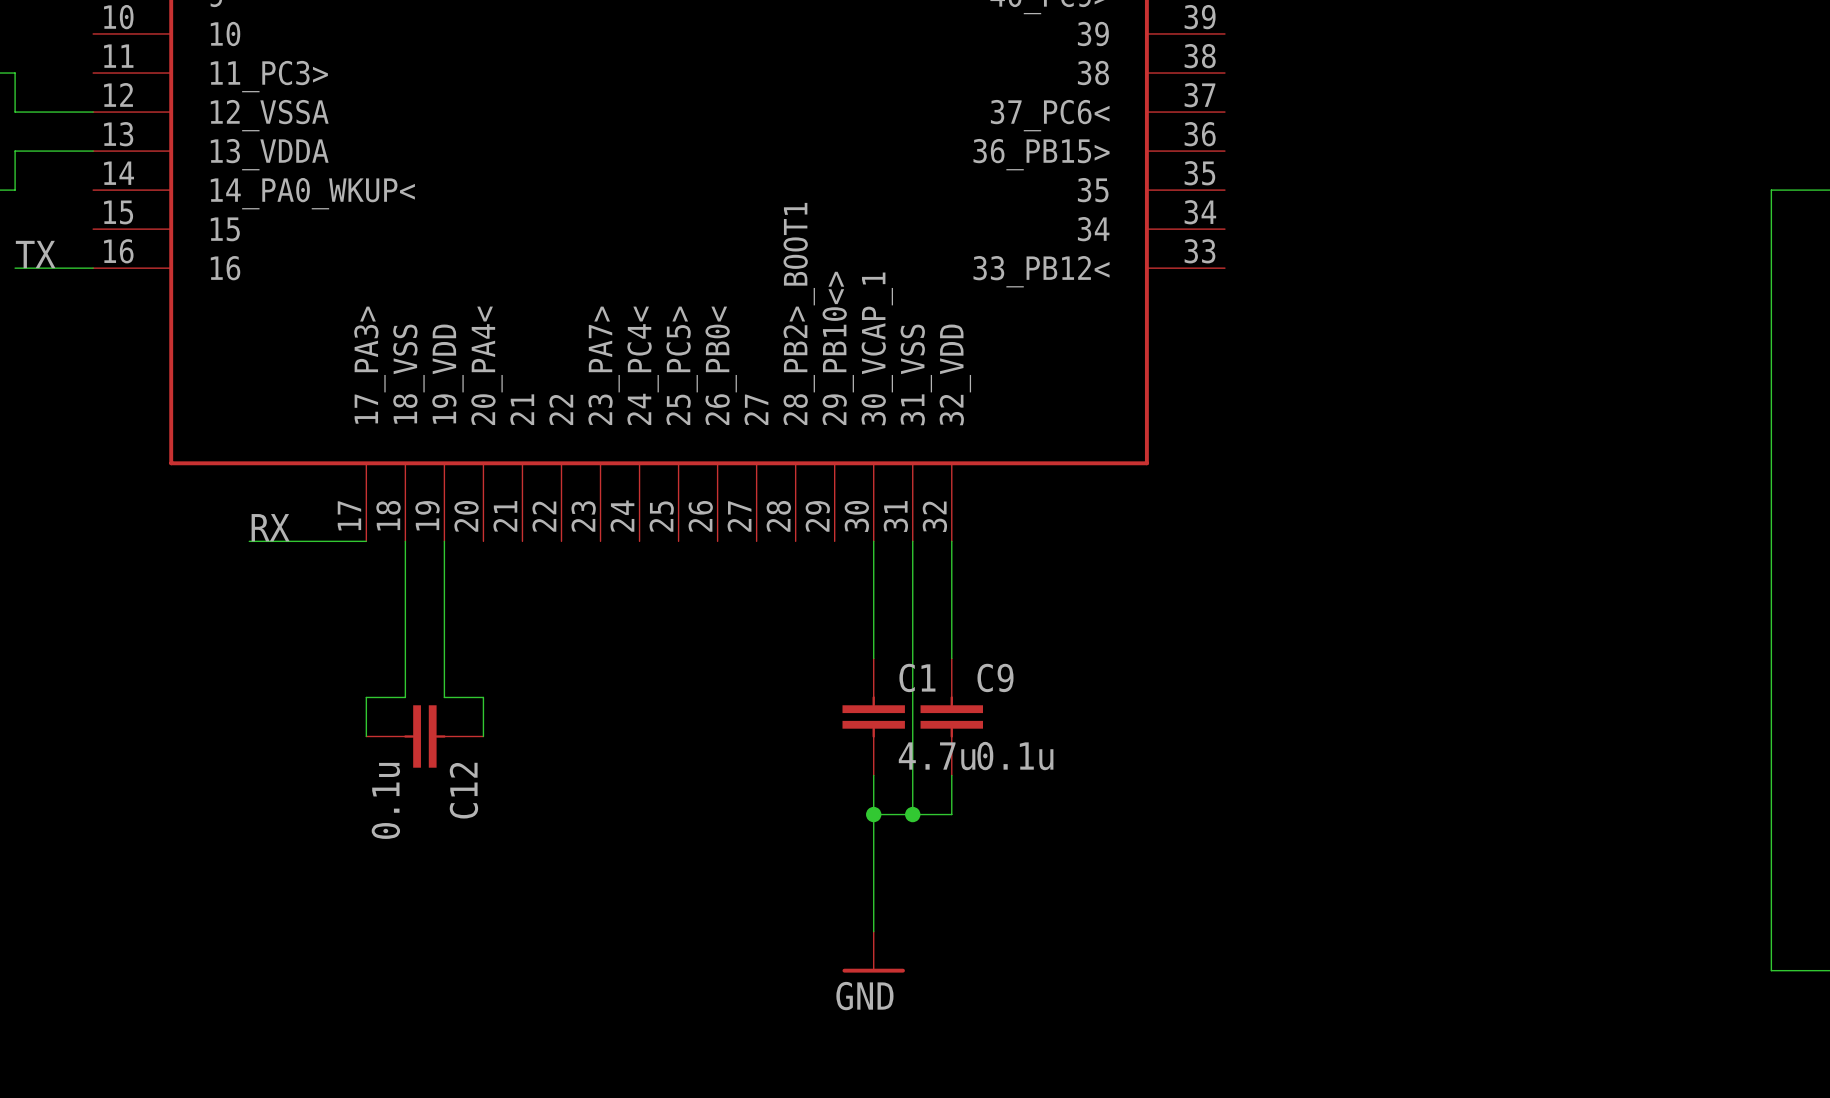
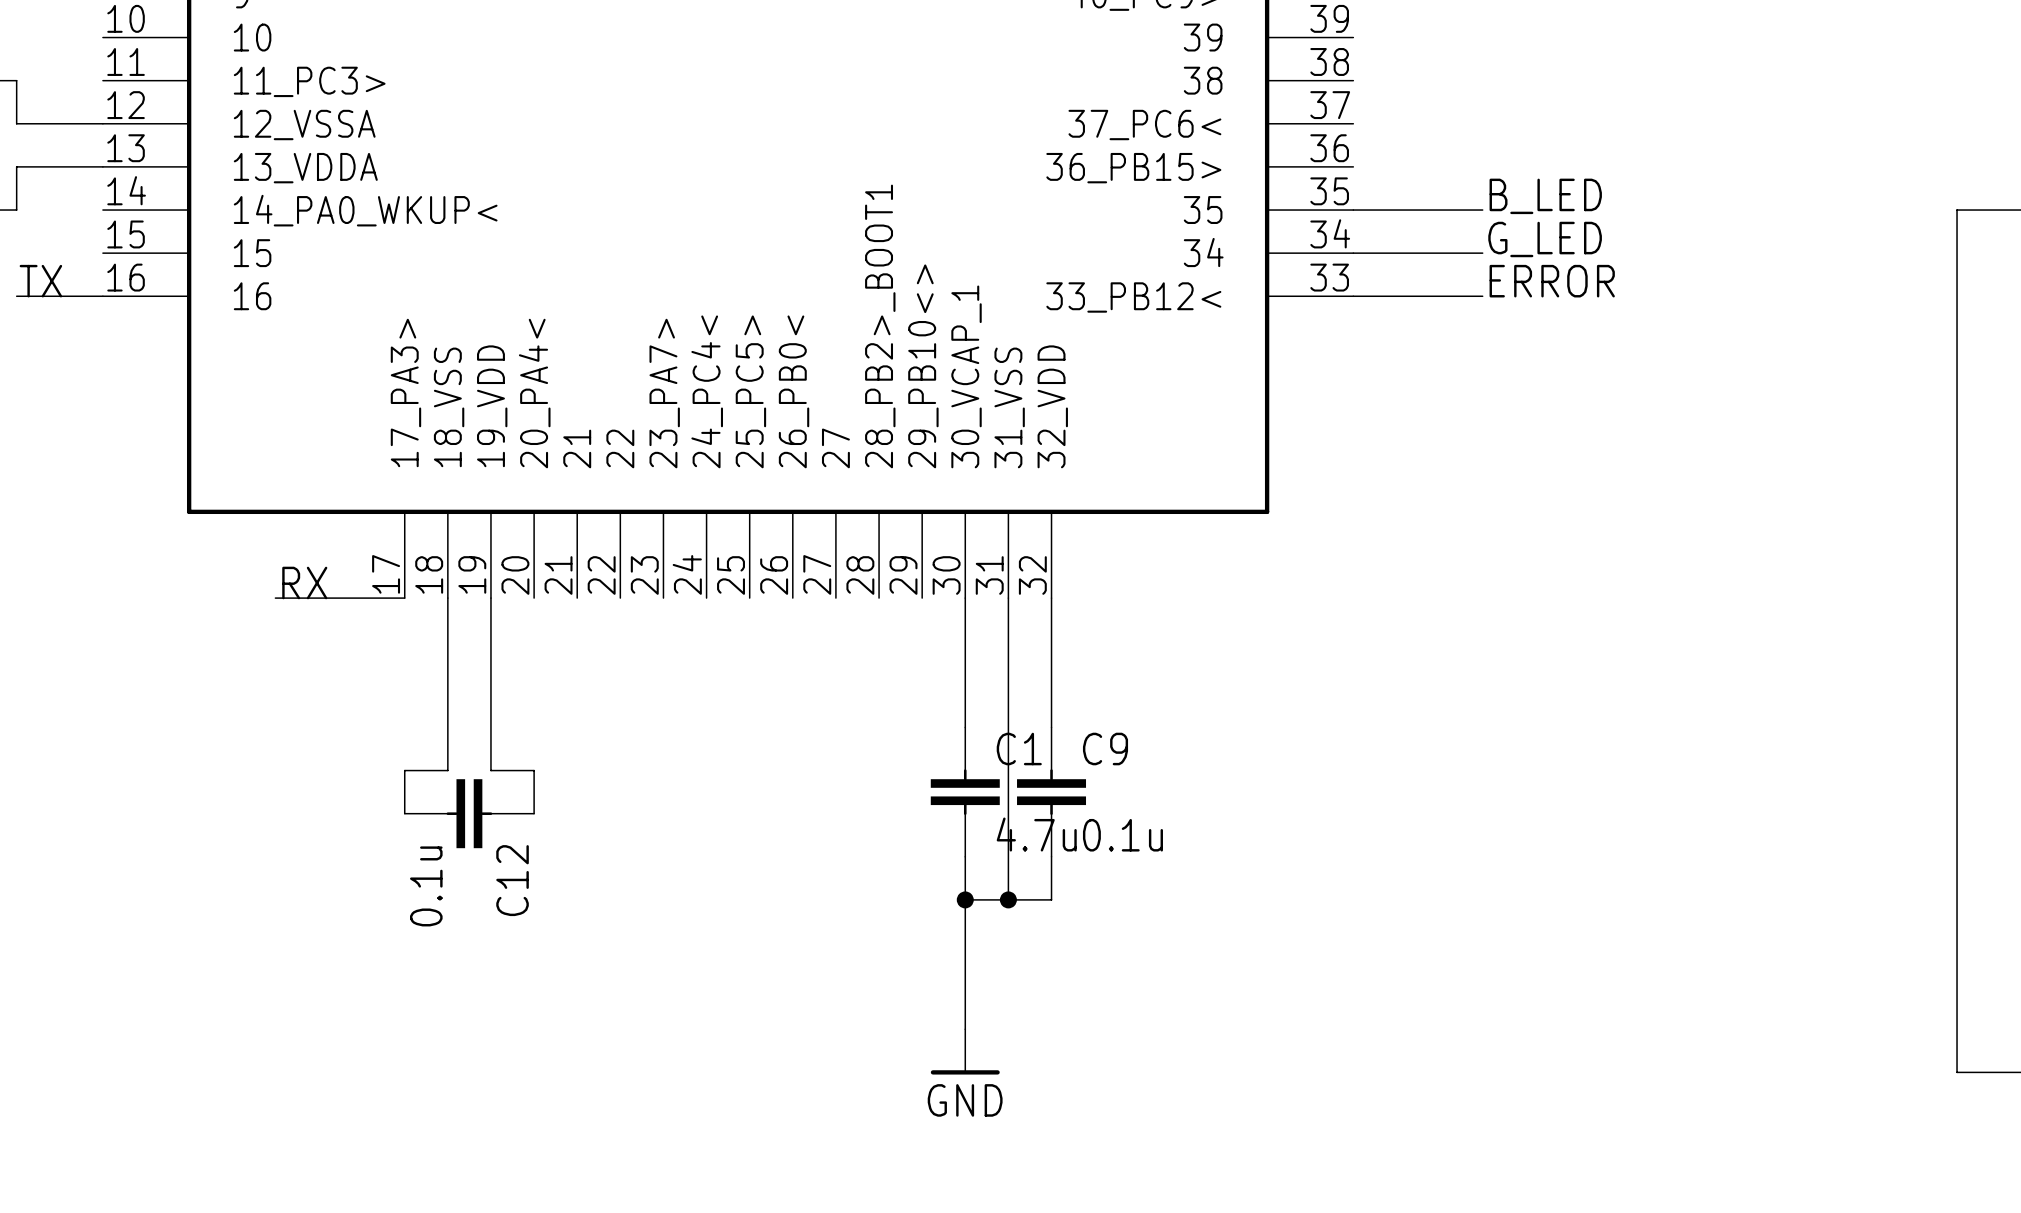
label: none -> B_LED (1545, 196)
wire: none -> (1353, 210) (1482, 210)
label: none -> G_LED (1545, 239)
wire: none -> (1353, 253) (1482, 253)
label: none -> ERROR (1552, 281)
wire: none -> (1353, 296) (1482, 296)

